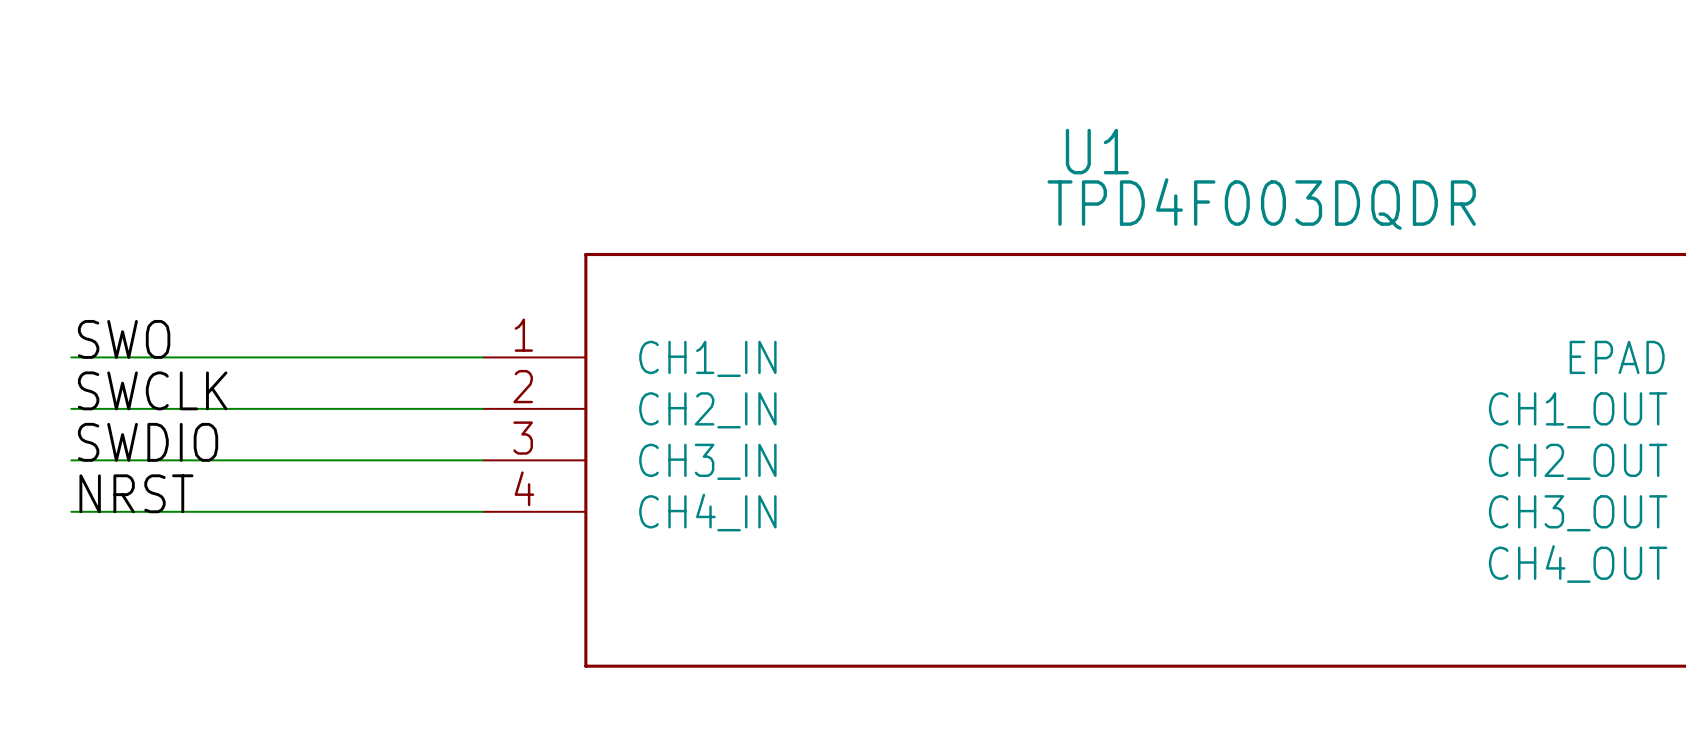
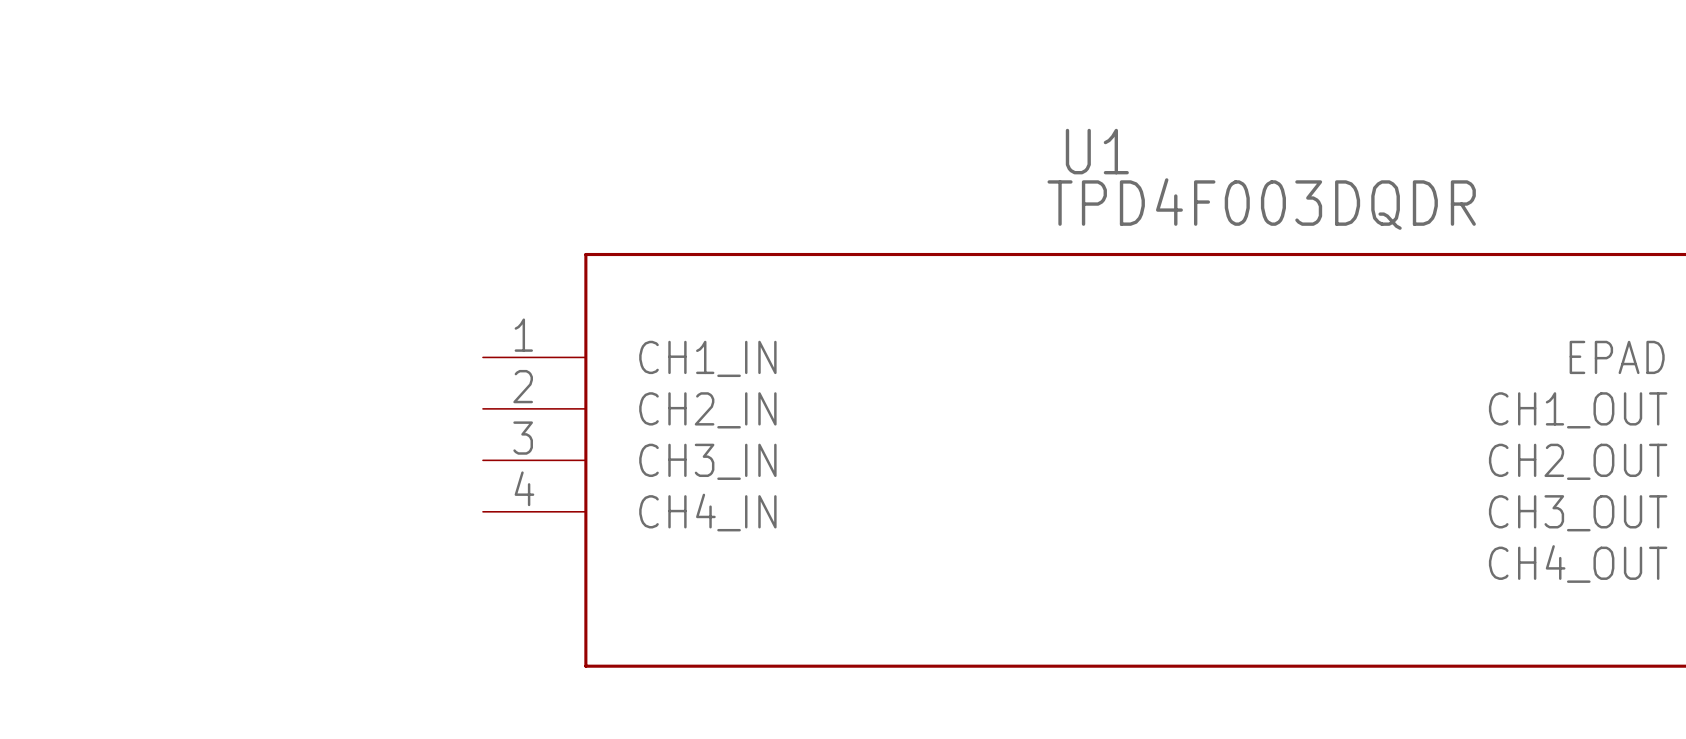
label: SWO (124, 339) -> none
wire: (71, 357) (482, 357) -> none
label: SWCLK (152, 390) -> none
wire: (71, 408) (482, 408) -> none
label: SWDIO (148, 442) -> none
wire: (71, 460) (482, 460) -> none
label: NRST (136, 493) -> none
wire: (71, 511) (482, 511) -> none

